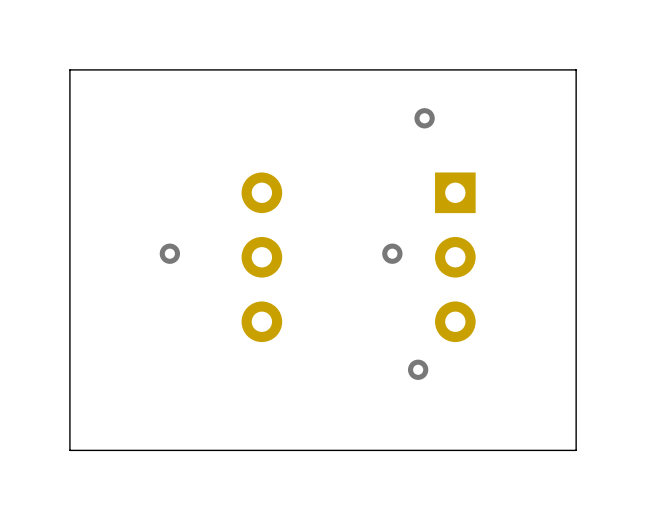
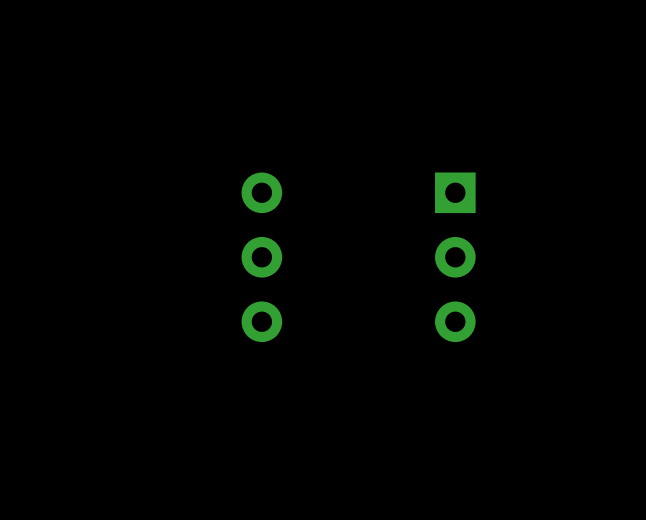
board edge: (576, 69) (576, 450) (69, 450) (69, 69) (576, 69) -> none
via: (424, 118) -> none
via: (169, 253) -> none
via: (392, 253) -> none
via: (418, 369) -> none

